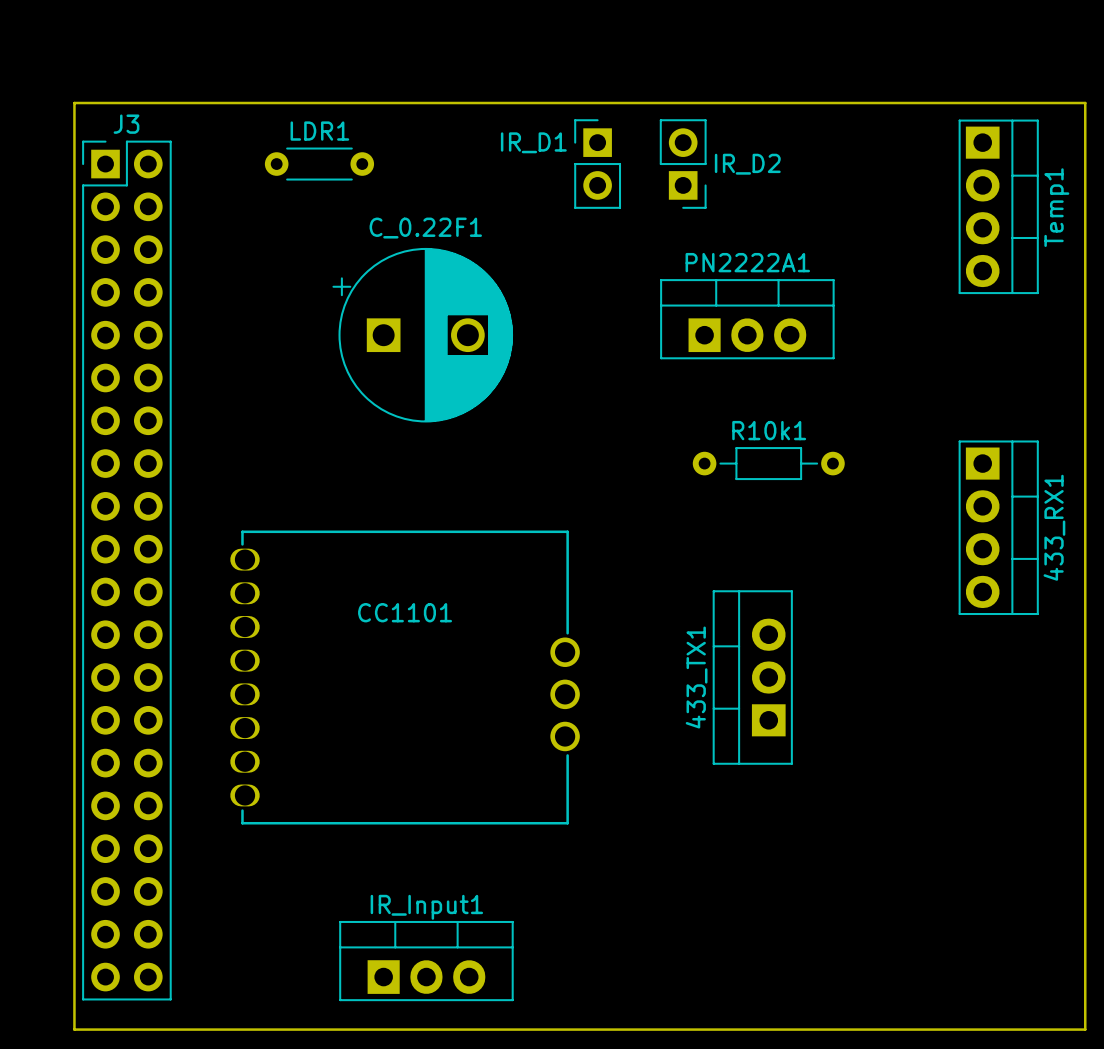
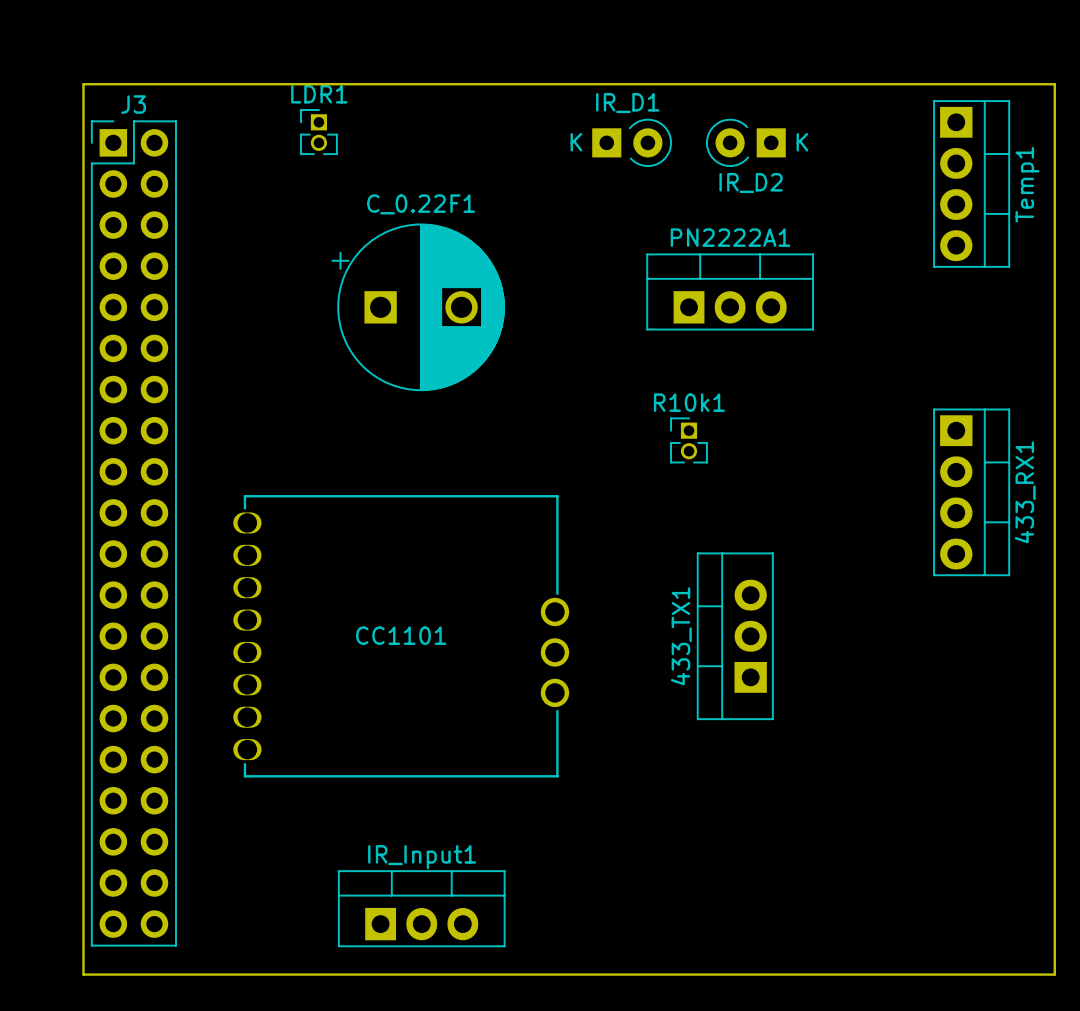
IR_D1 footprint: [574, 119, 622, 209] -> [592, 118, 673, 167]
IR_D2 footprint: [659, 119, 707, 209] -> [705, 118, 786, 168]
IR_D1 name position: IR_D1 (533, 142) -> IR_D1 (627, 103)
LDR1 footprint: [264, 147, 375, 181] -> [300, 109, 338, 156]
IR_D2 name position: IR_D2 (747, 164) -> IR_D2 (751, 183)
R10k1 footprint: [692, 447, 845, 481] -> [670, 417, 708, 464]
CC1101 name position: CC1101 (405, 612) -> CC1101 (401, 635)

